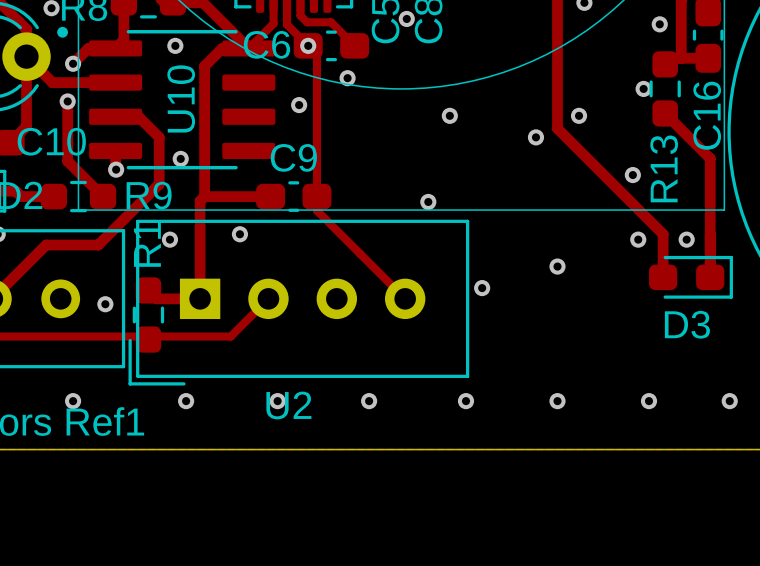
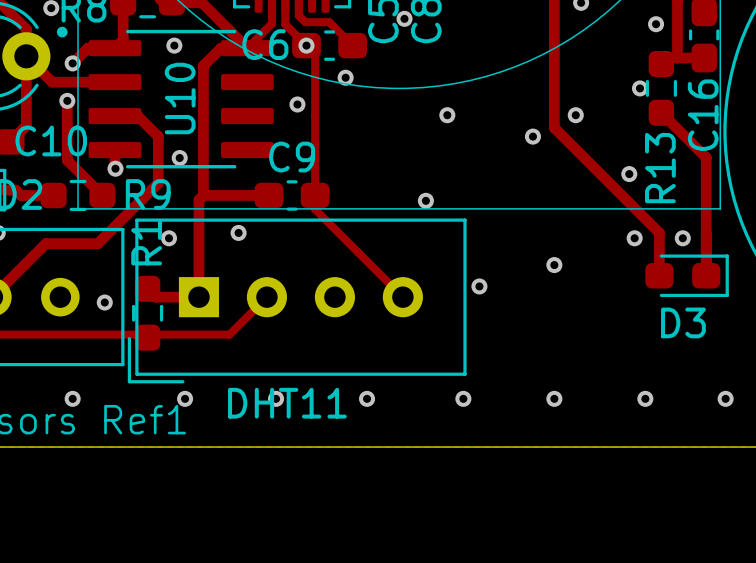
U2 name: U2 (288, 405) -> DHT11 (287, 403)

